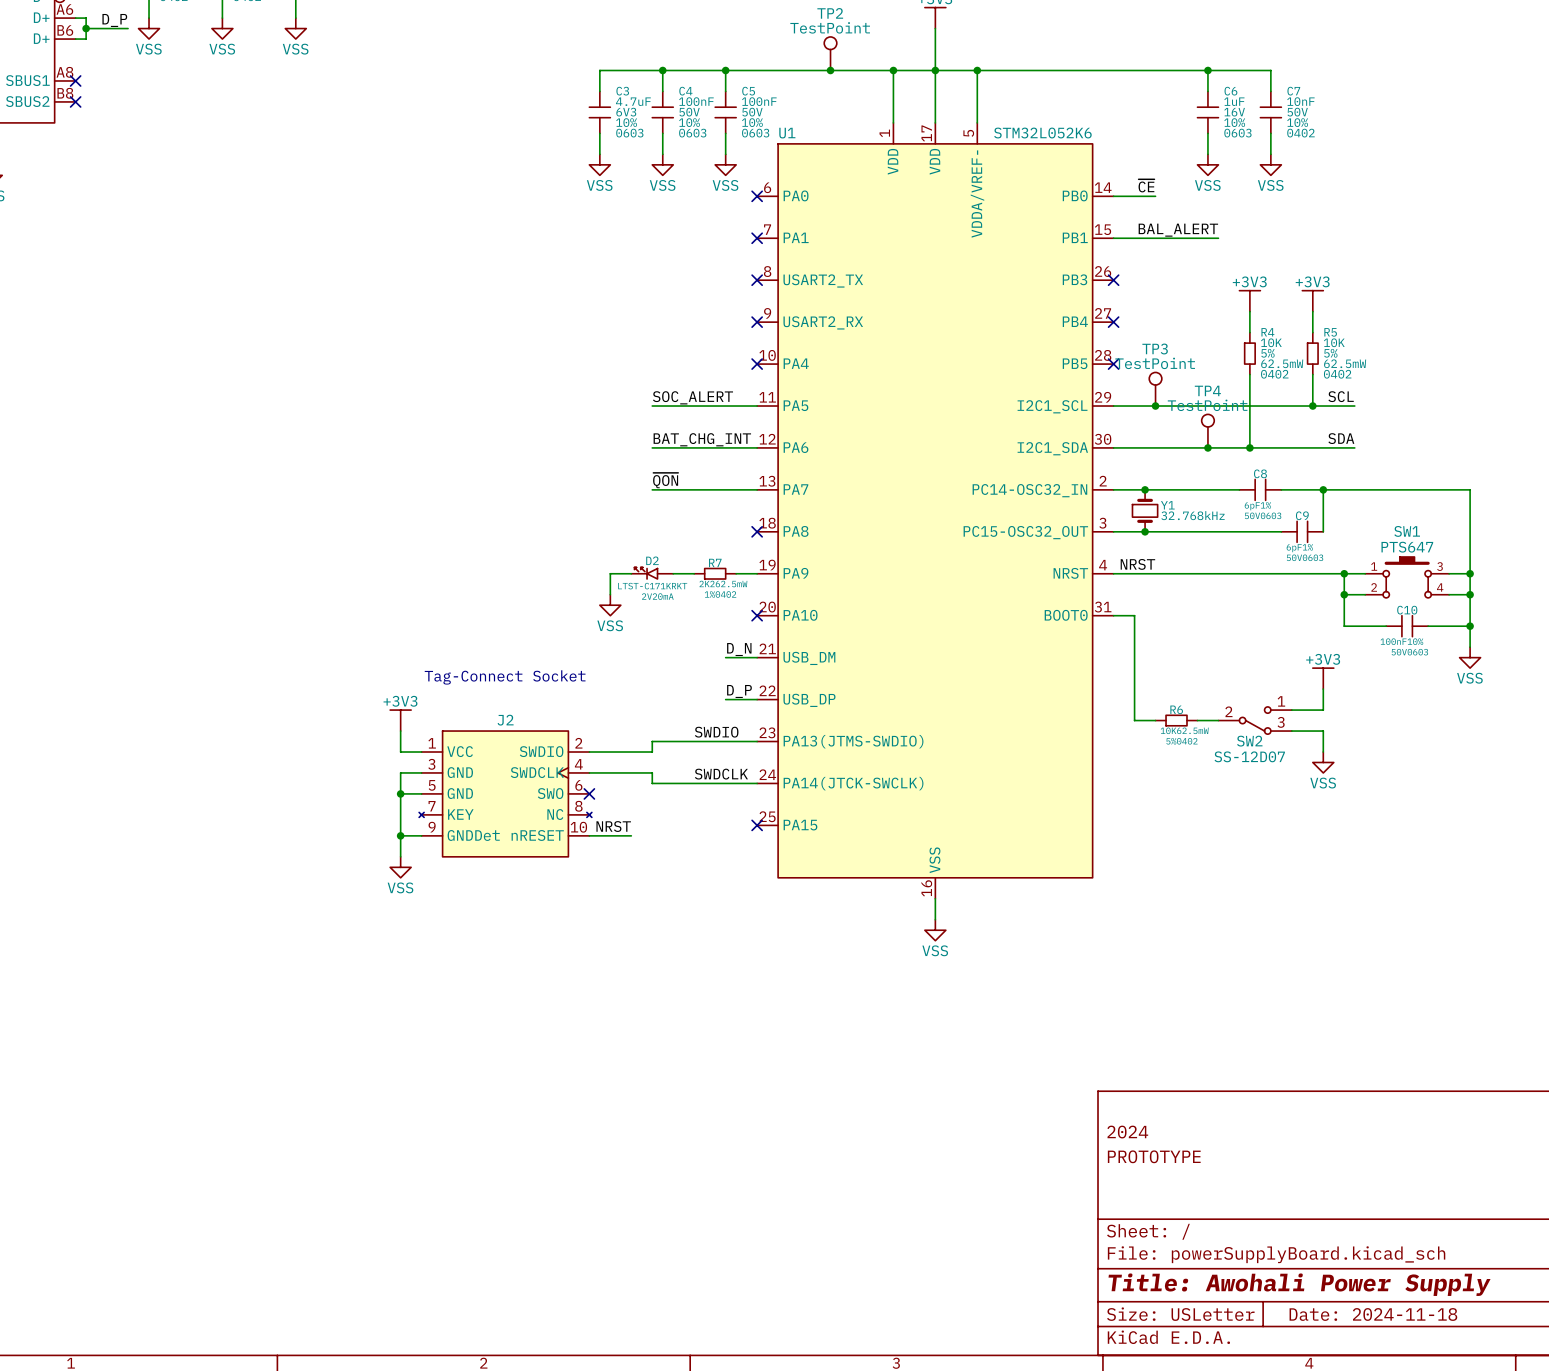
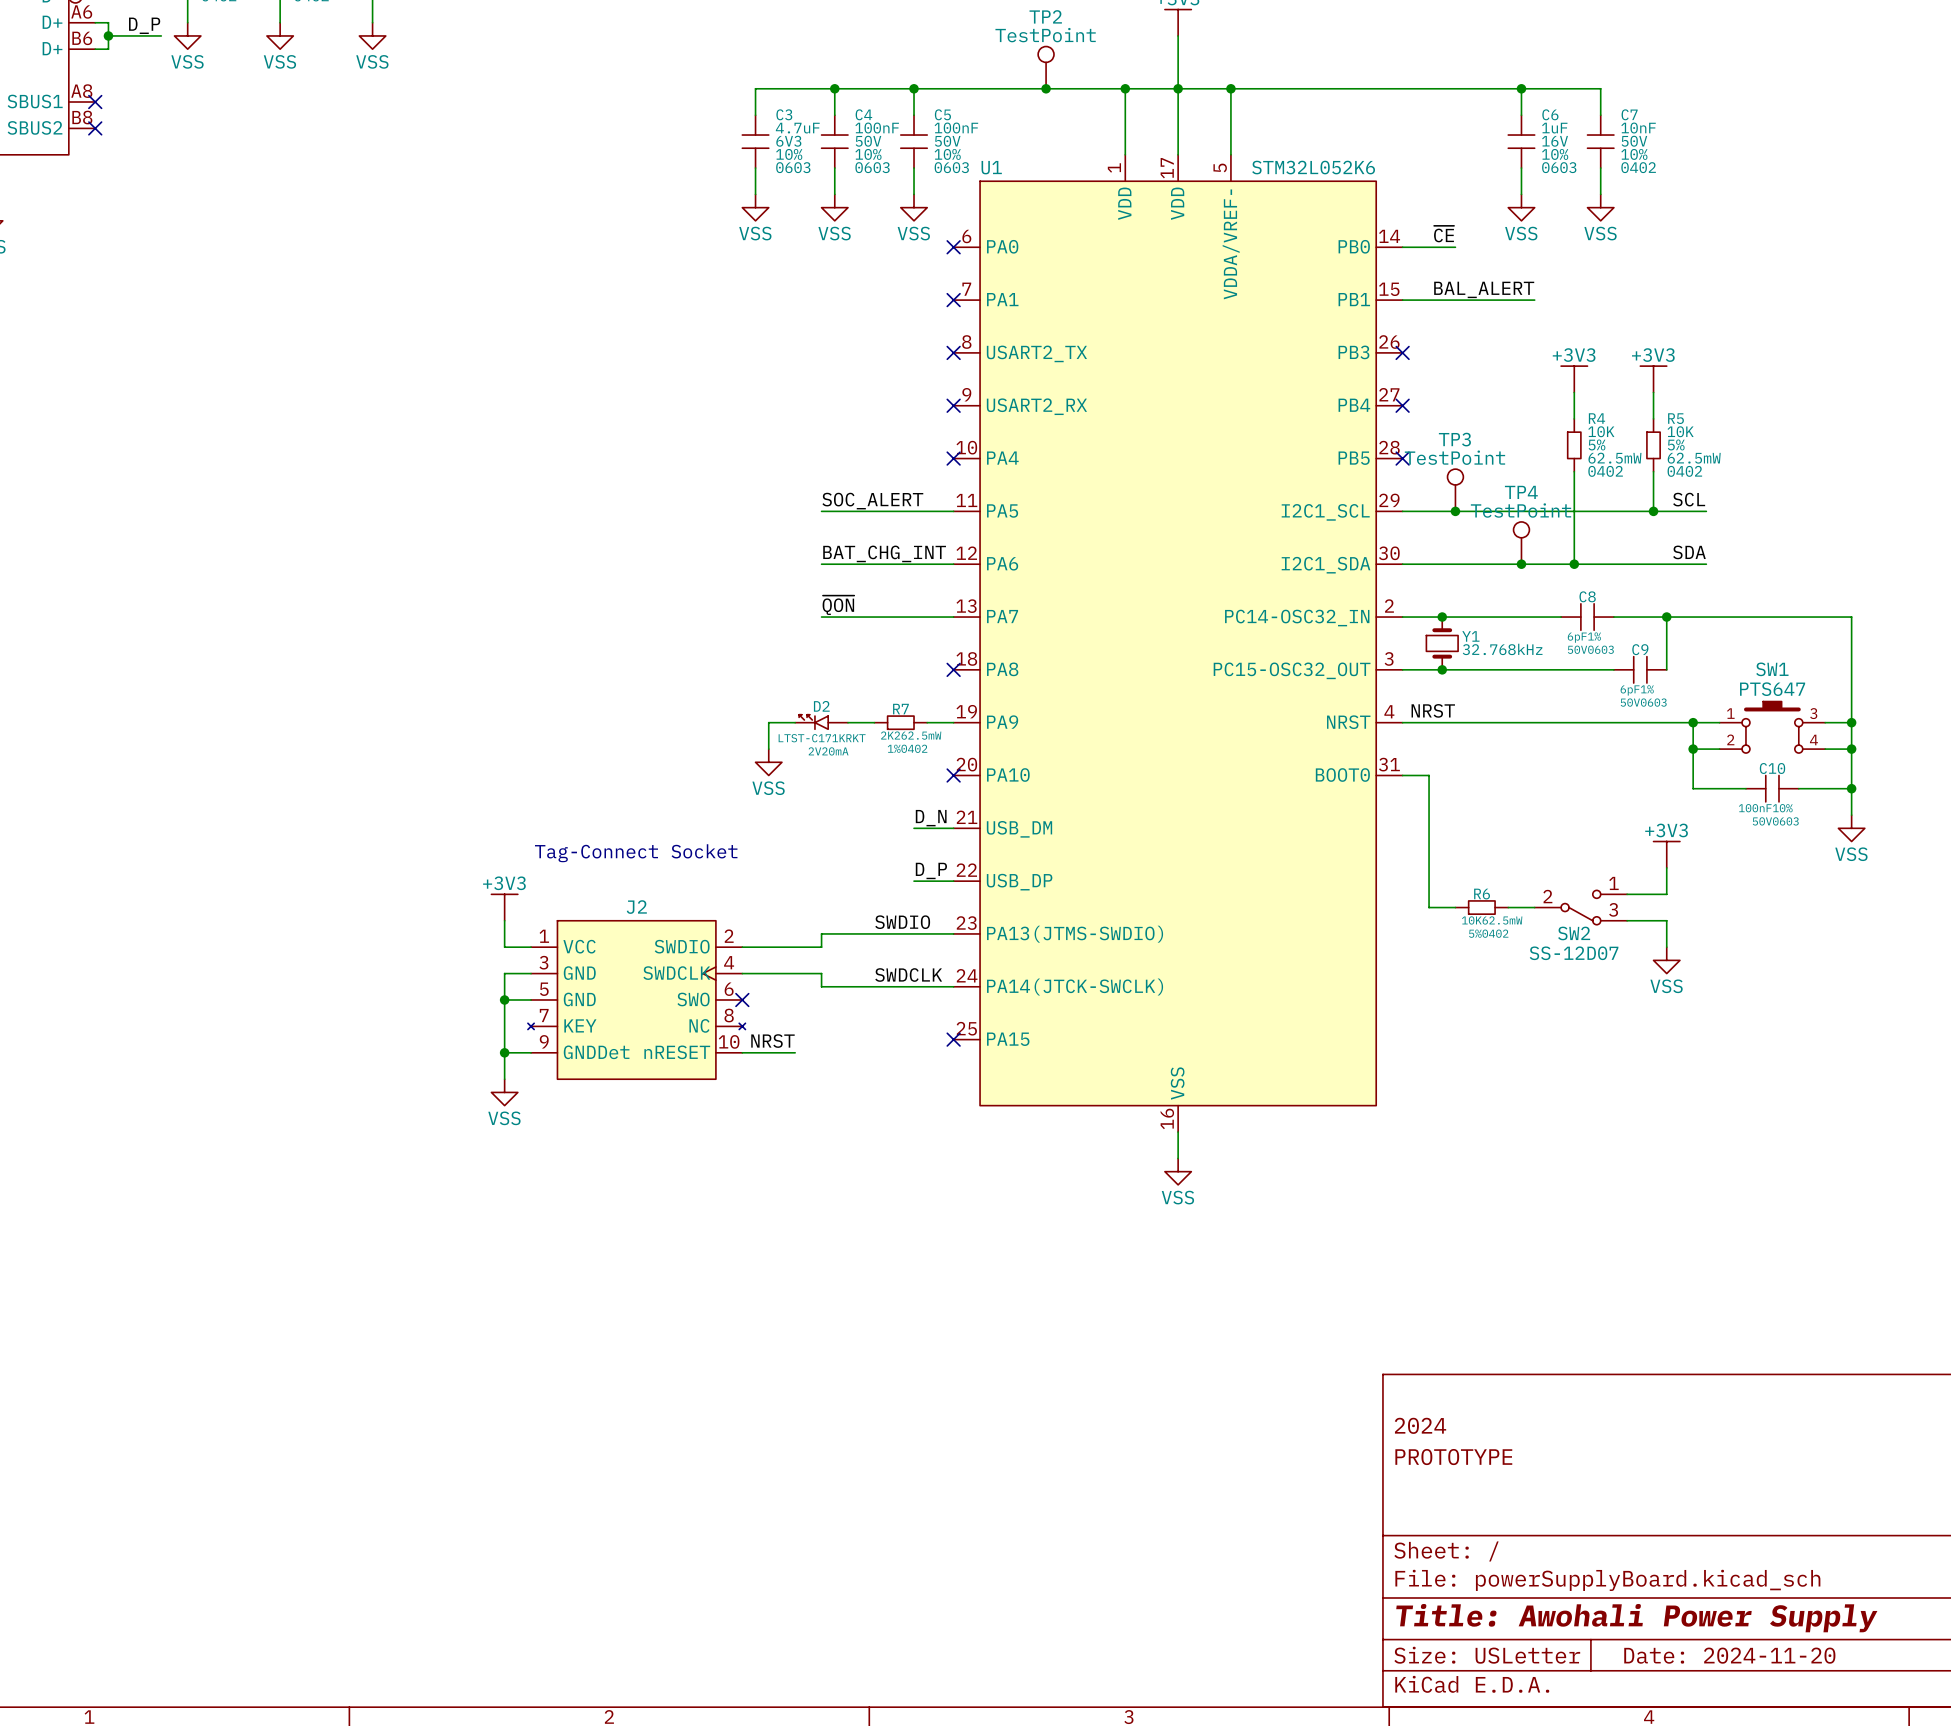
title block: Date: 2024-11-18 (1373, 1314) -> Date: 2024-11-20 (1729, 1655)

